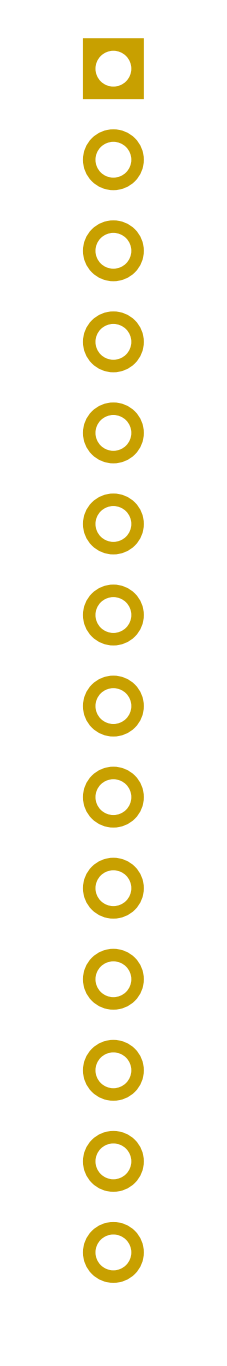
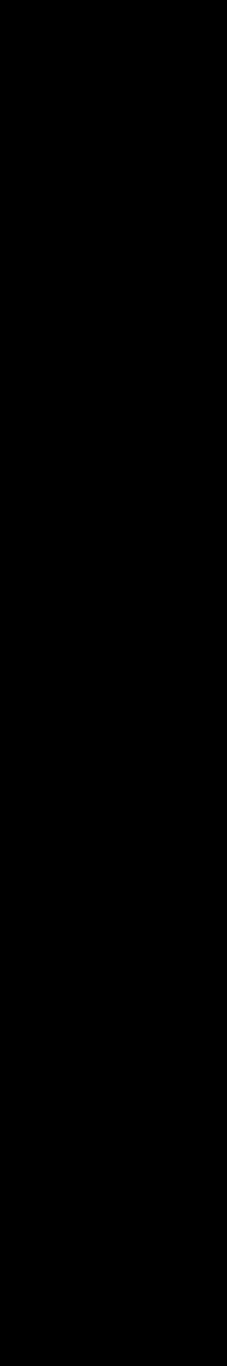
part: (113, 660) -> none

